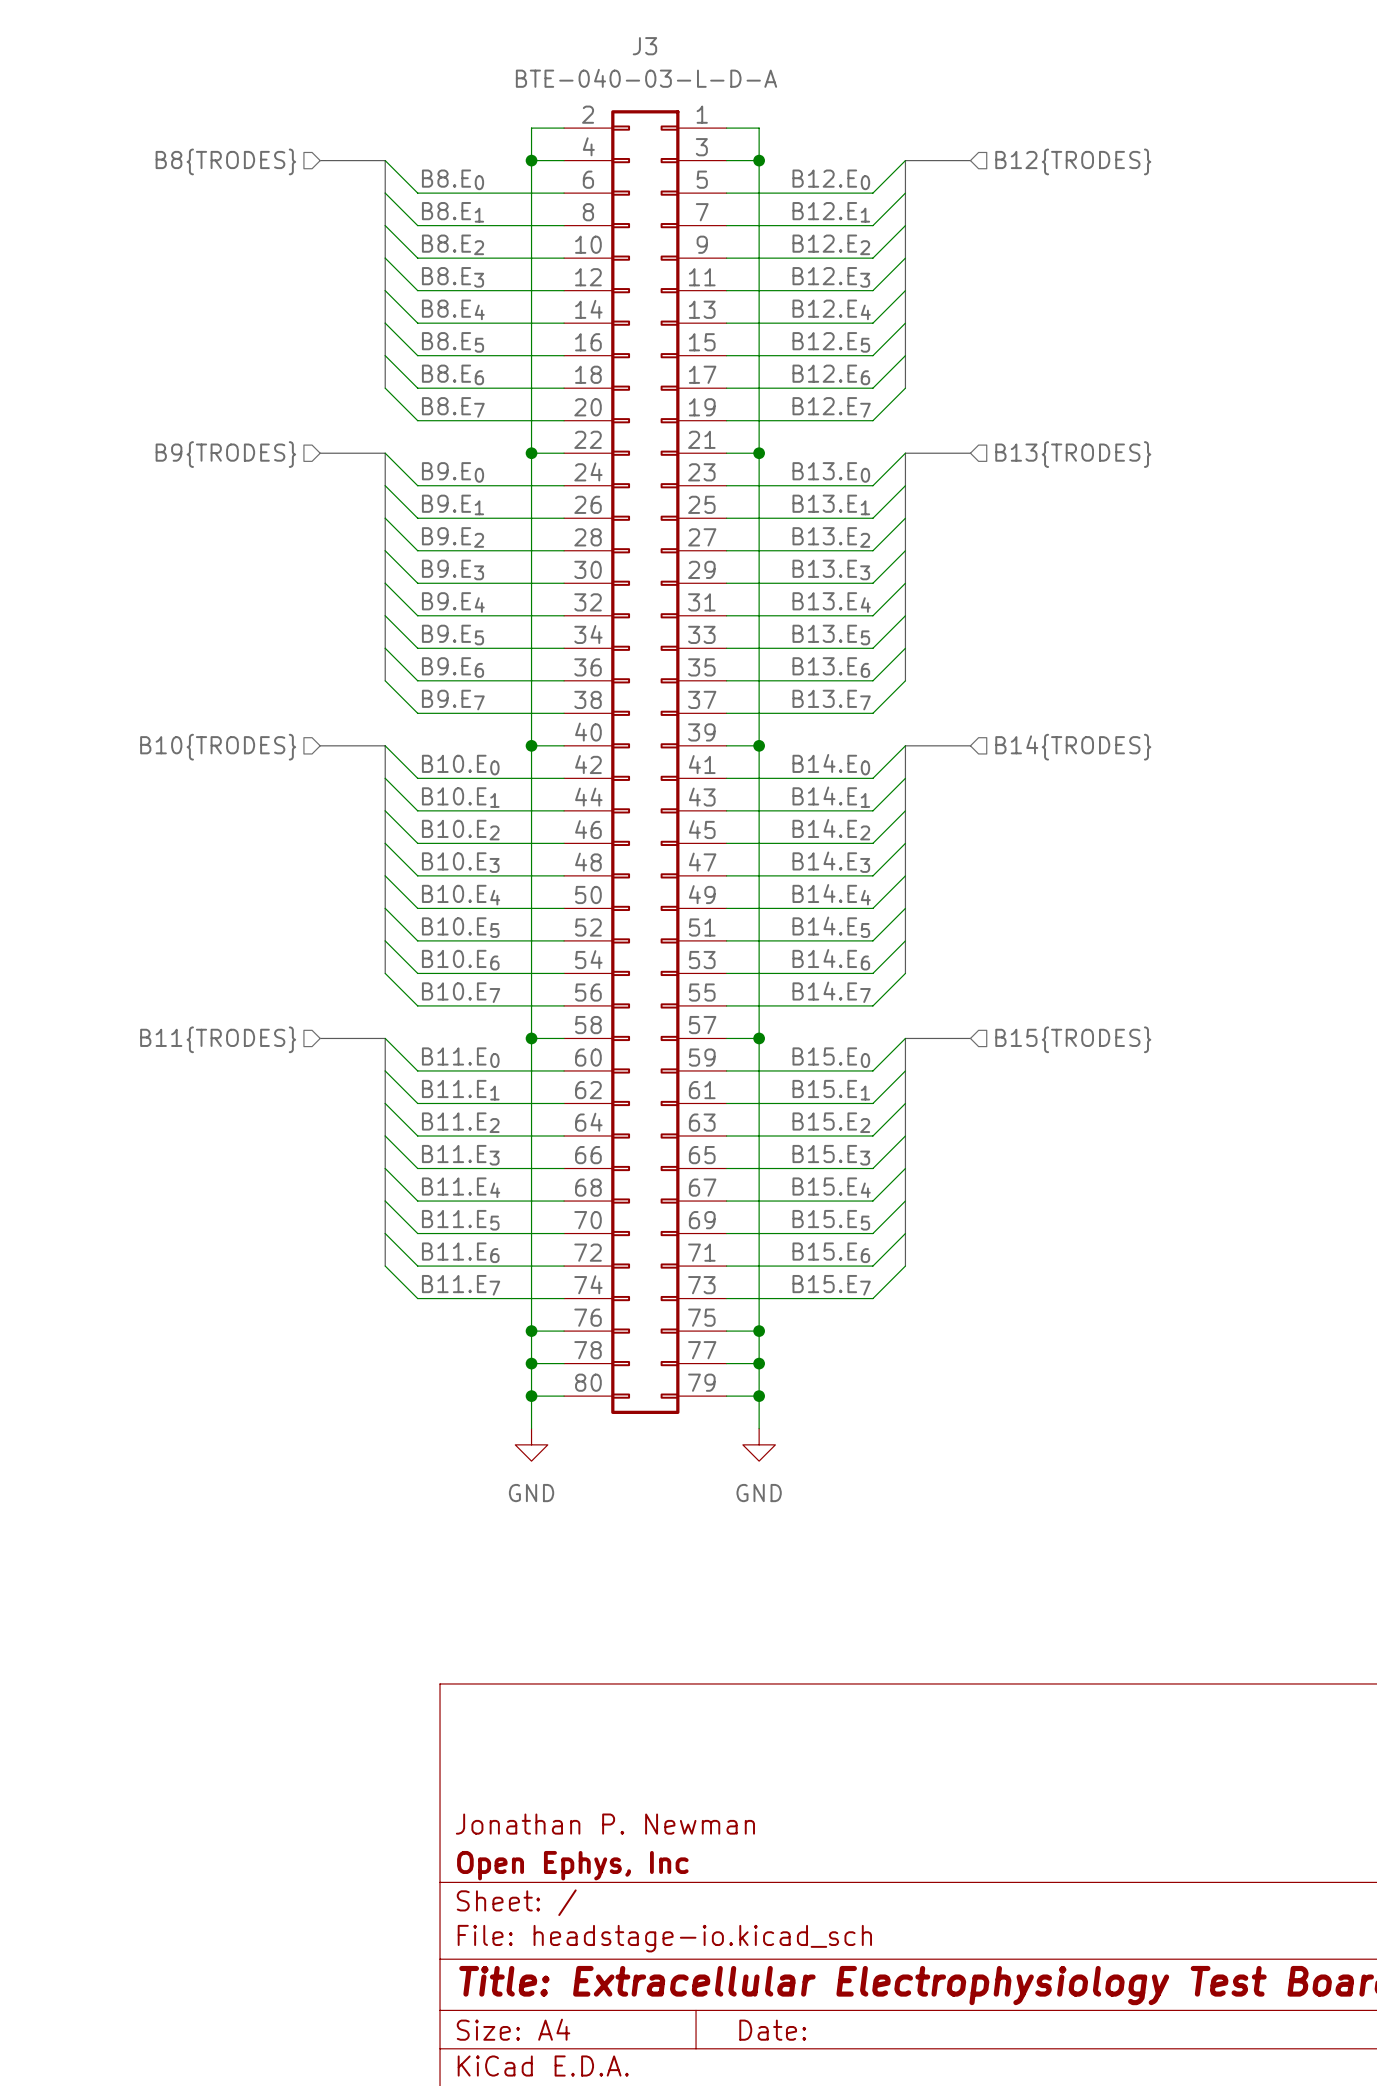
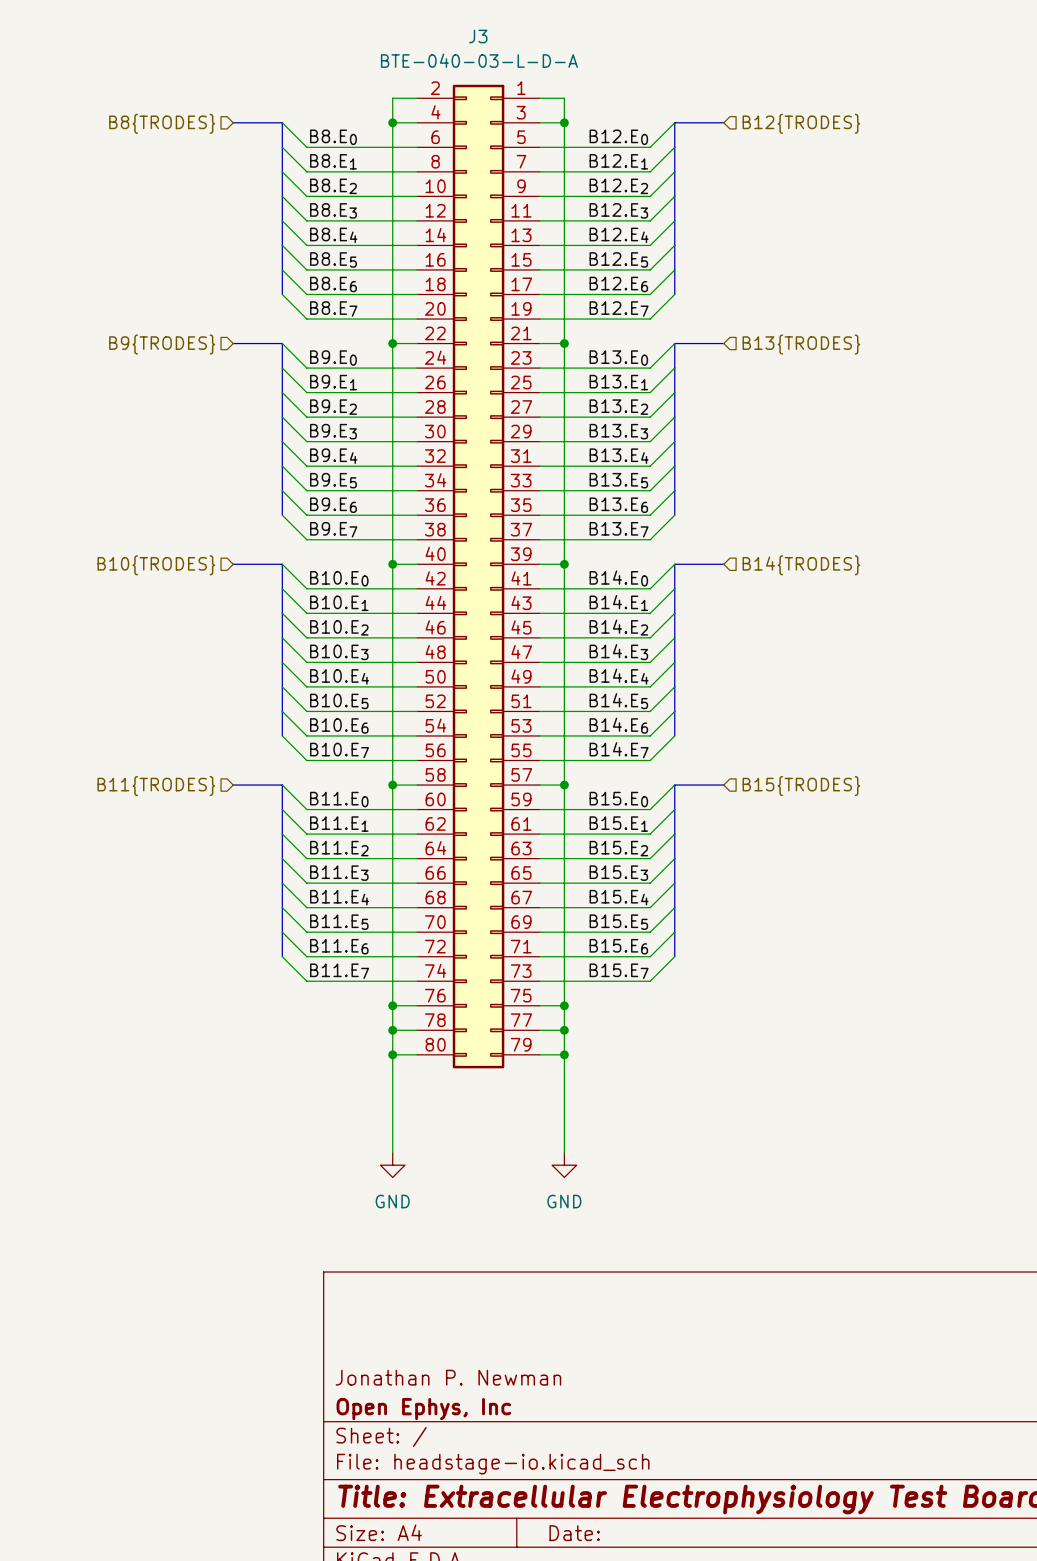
wire: none -> (392, 1079) (392, 1152)
wire: none -> (564, 1079) (564, 1152)
power symbol position: GND (531, 1444) -> GND (392, 1165)
power symbol position: GND (759, 1444) -> GND (564, 1165)

